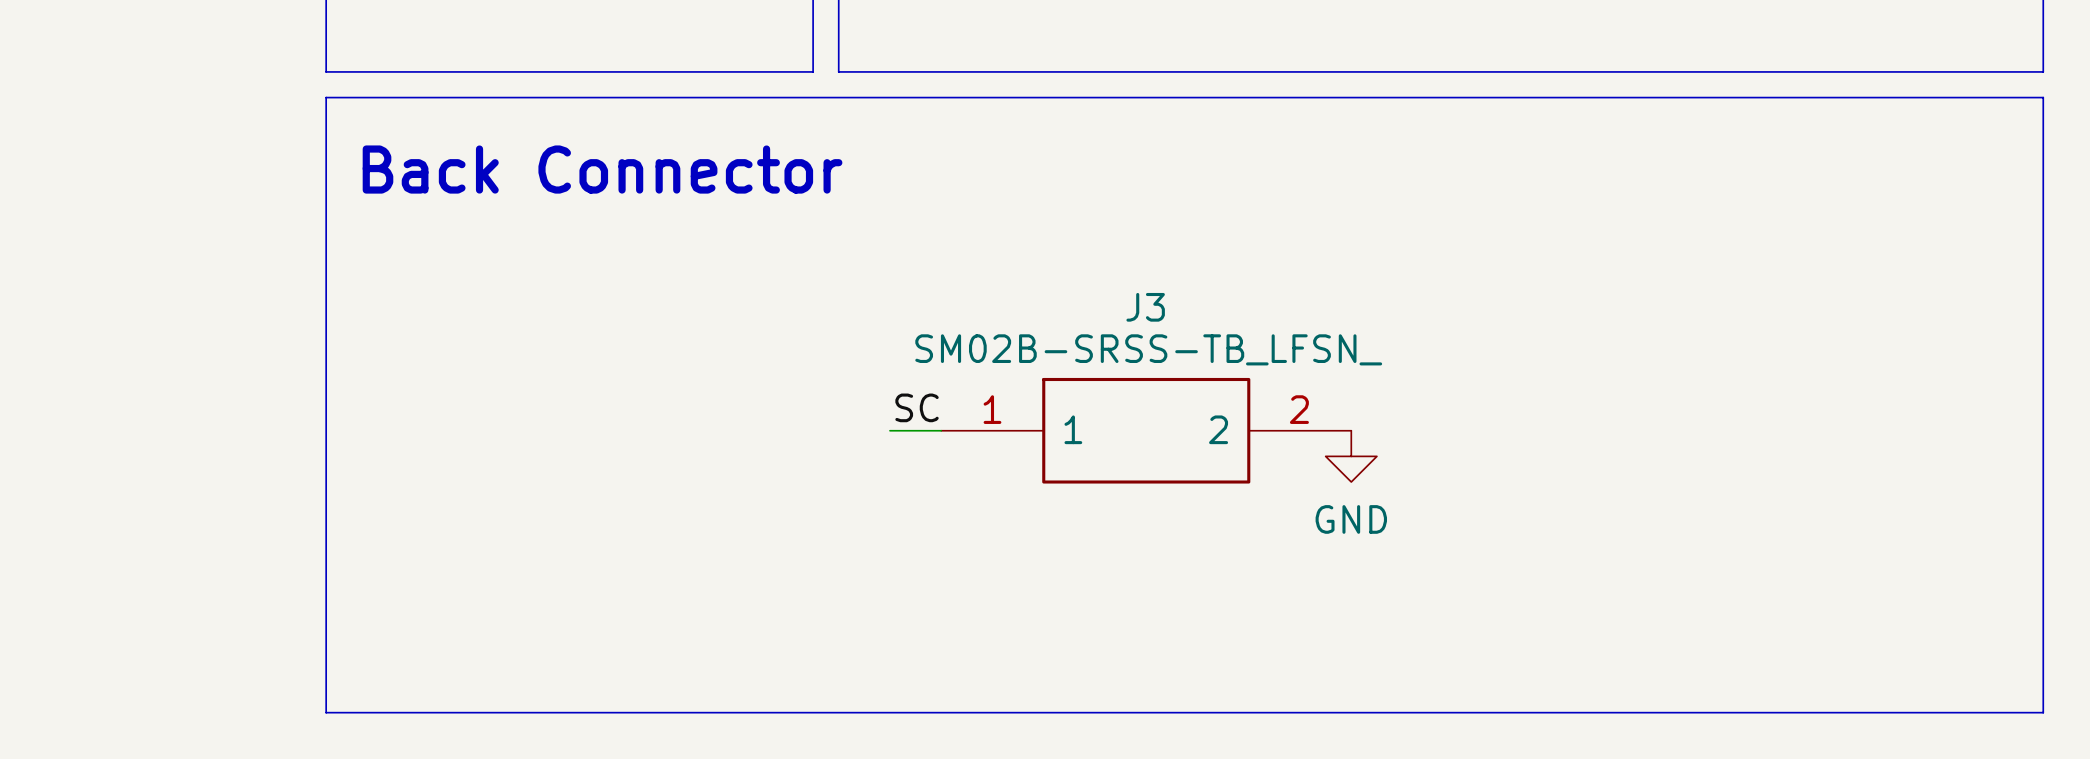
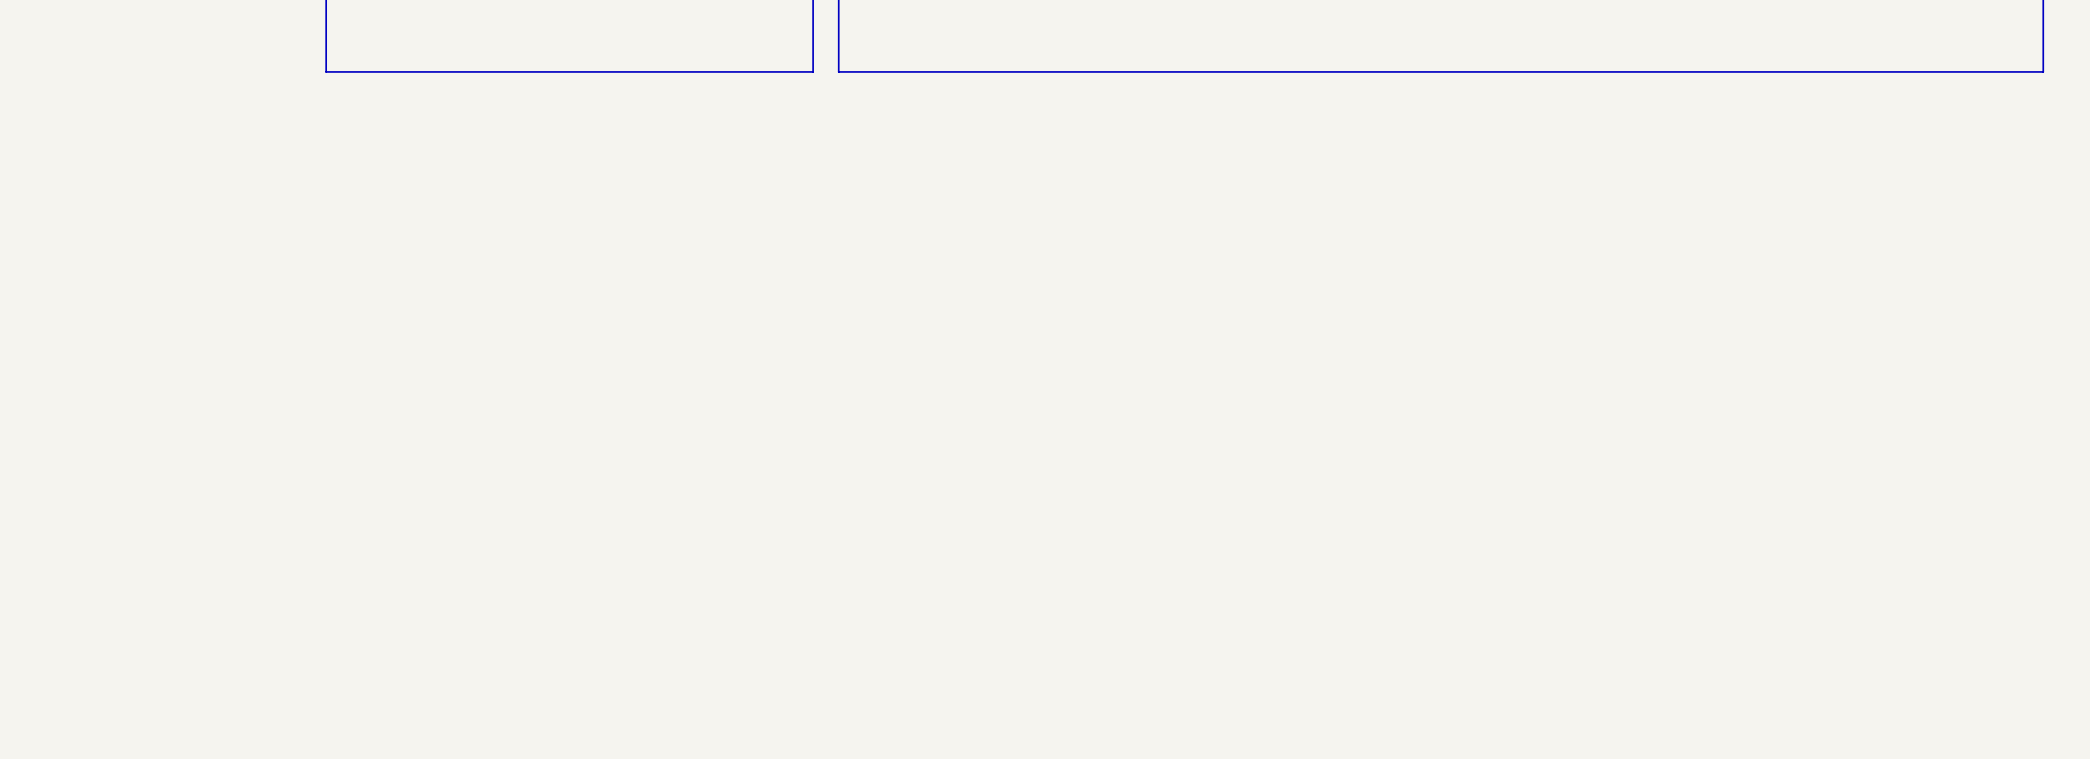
line: (326, 97) (2043, 97) (2043, 712) (326, 712) (326, 97) -> none
text: Back Connector (602, 169) -> none
label: SC (917, 407) -> none
wire: (889, 430) (941, 430) -> none
J3: SM02B-SRSS-TB_LFSN_ (1146, 430) -> none
power symbol: GND (1351, 456) -> none

